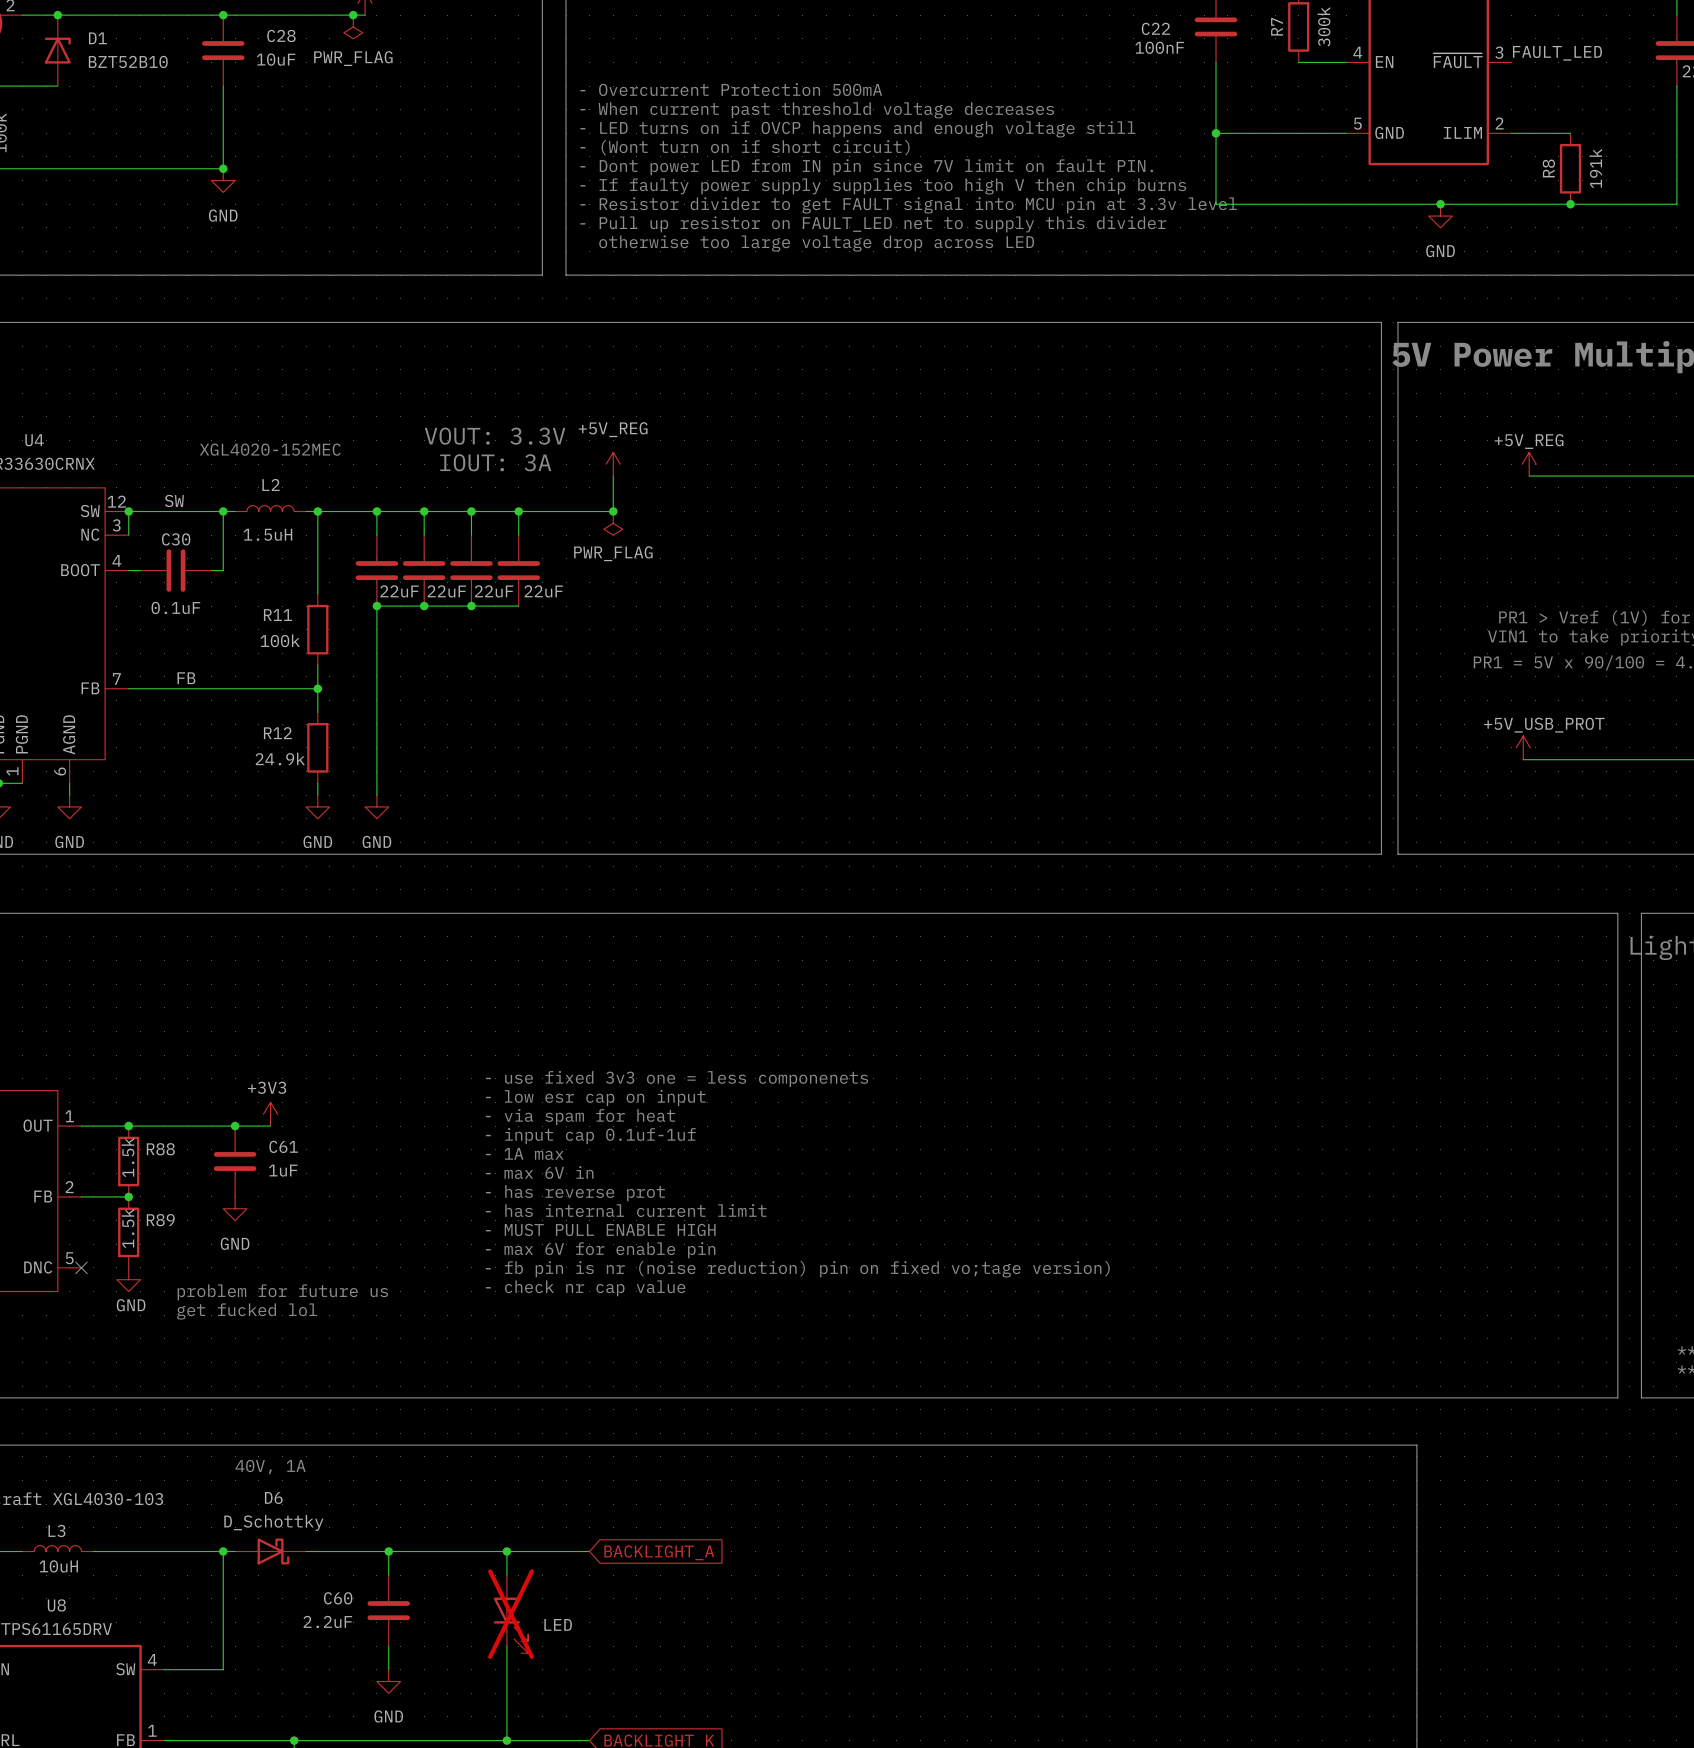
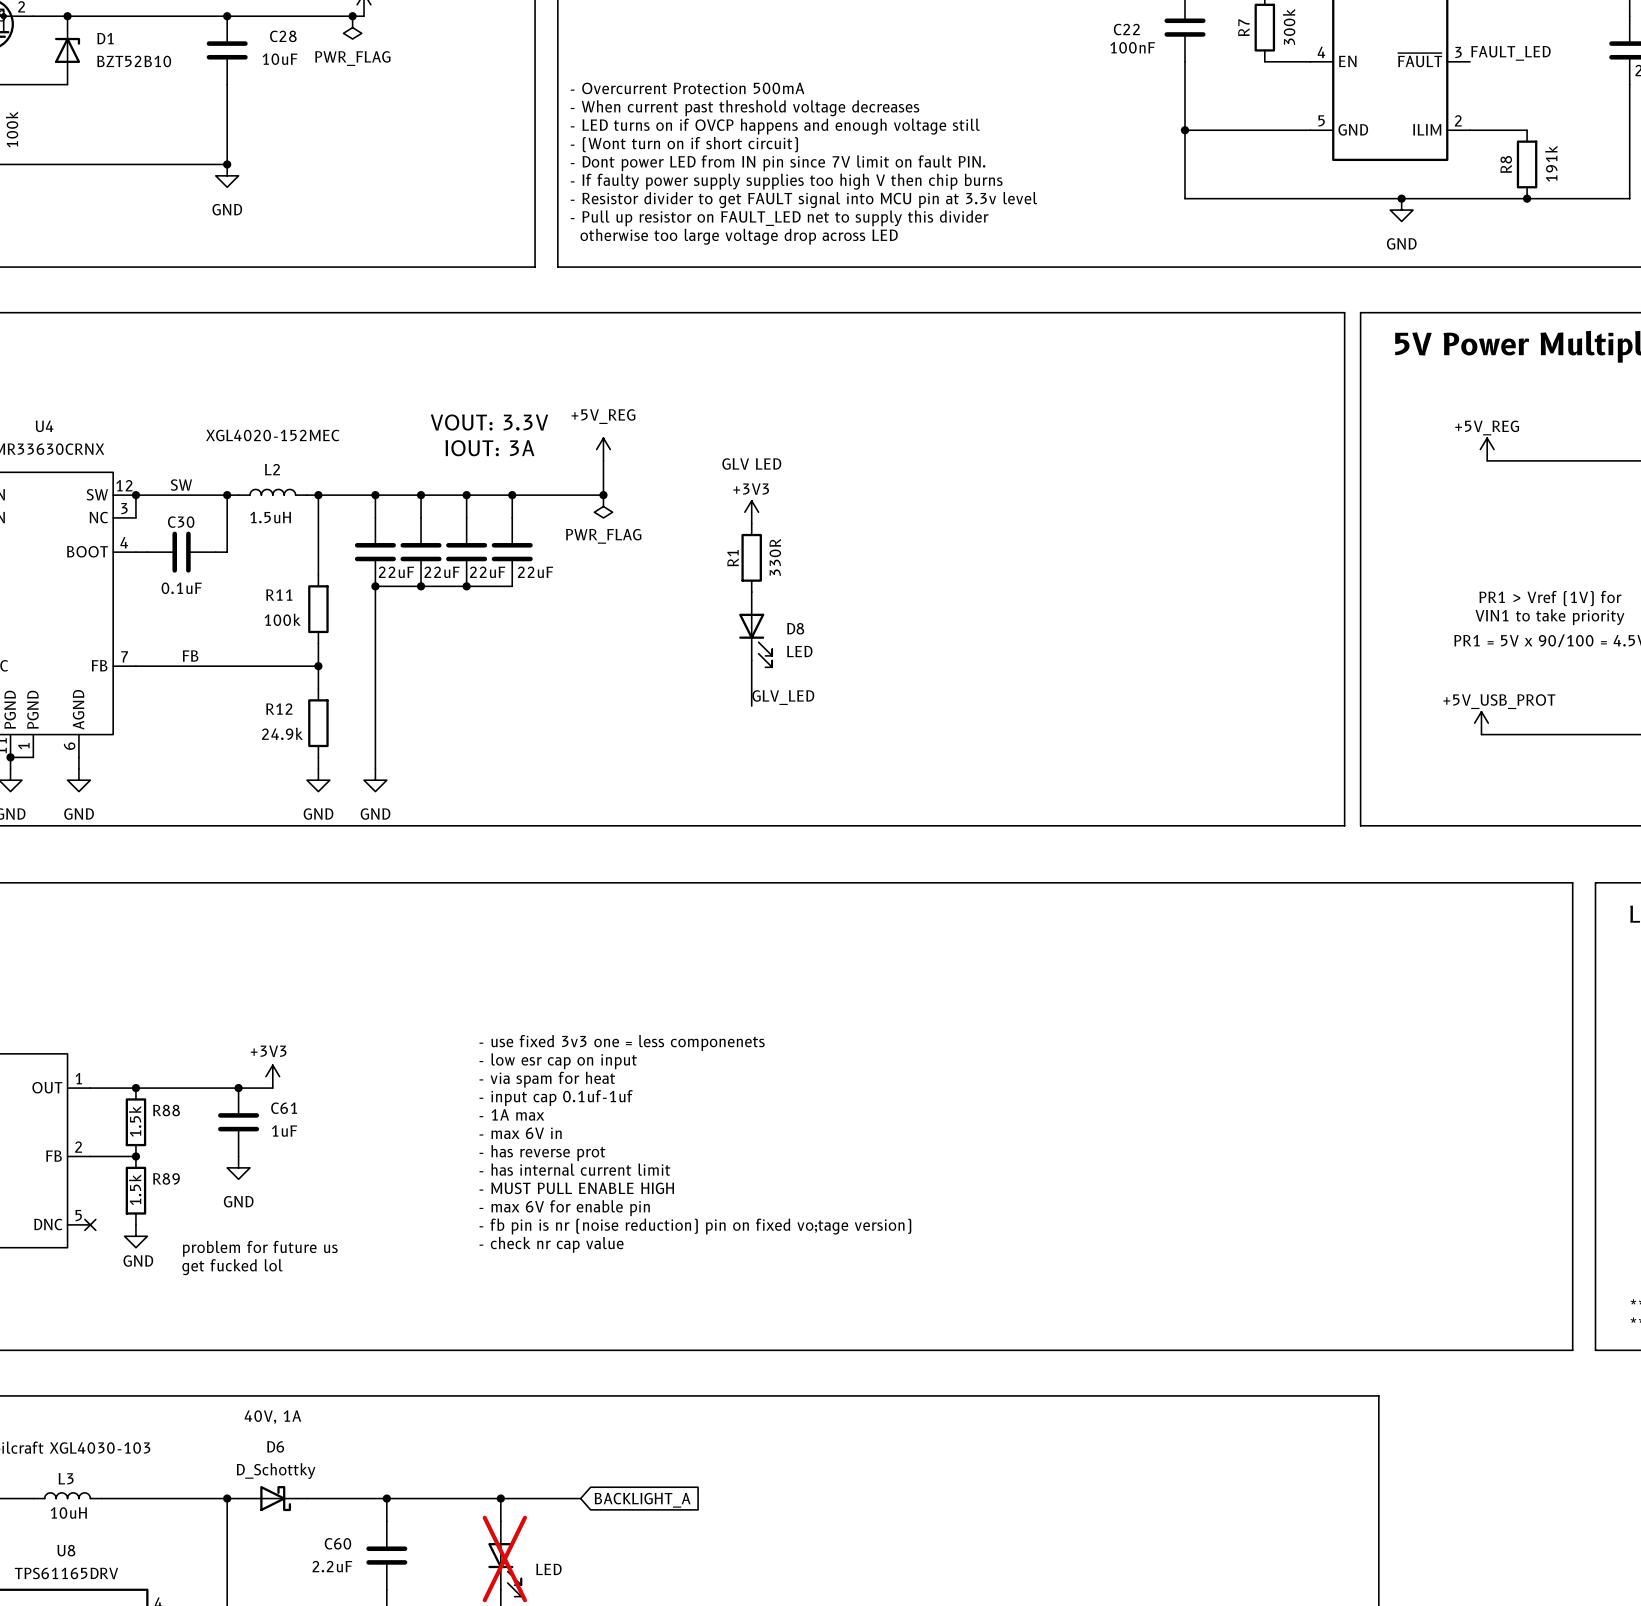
text: none -> GLV LED (751, 464)
power symbol: none -> +3V3 (751, 512)
R1: none -> 330R (751, 557)
D8: none -> LED (755, 629)
wire: none -> (751, 660) (751, 706)
label: none -> GLV_LED (783, 697)

